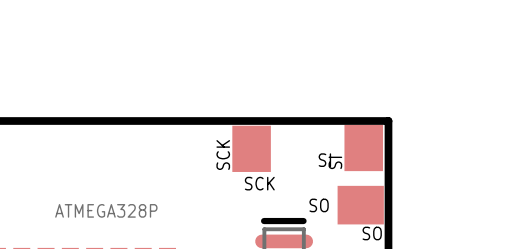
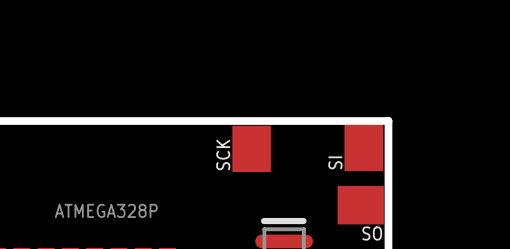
text: SI (324, 160) -> none
text: SCK (259, 183) -> none
text: SO (319, 205) -> none

